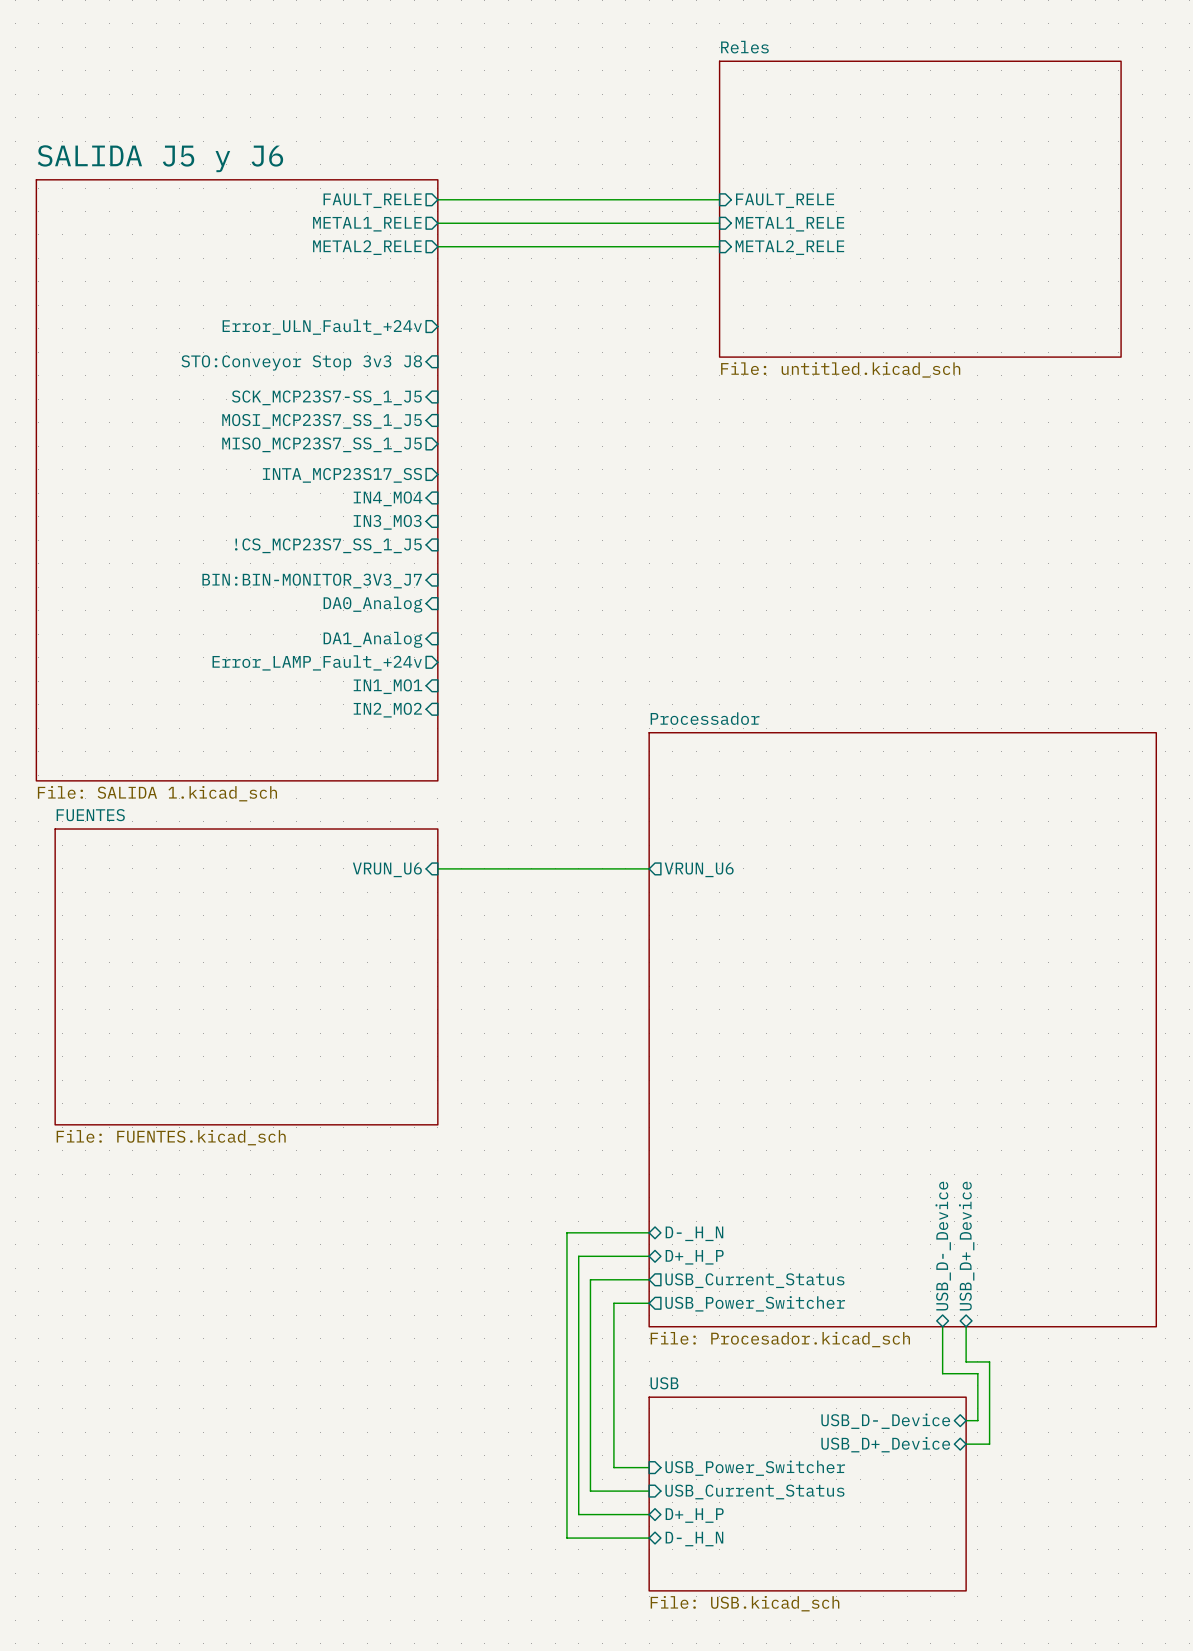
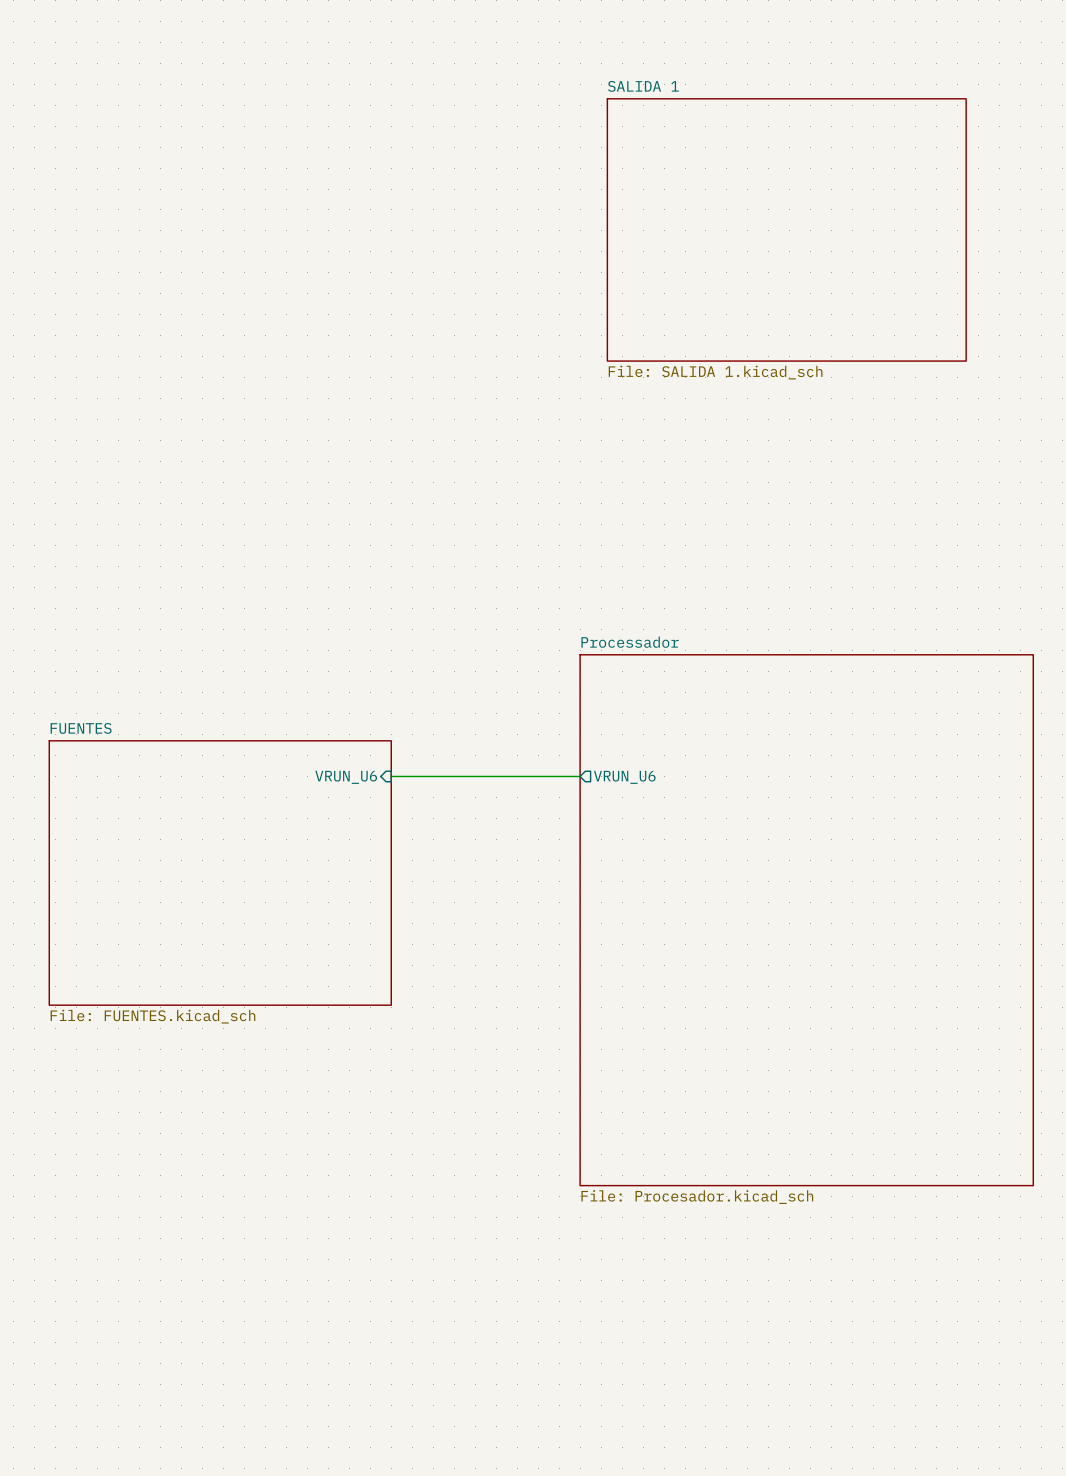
wire: (437, 199) (719, 199) -> none
sheet pin: FAULT_RELE (372, 200) -> none
sheet pin: FAULT_RELE (785, 200) -> none
sheet Reles: File: untitled.kicad_sch (920, 209) -> none
wire: (437, 223) (719, 223) -> none
sheet pin: METAL1_RELE (367, 224) -> none
sheet pin: METAL1_RELE (789, 224) -> none
wire: (437, 246) (719, 246) -> none
sheet pin: METAL2_RELE (367, 247) -> none
sheet pin: METAL2_RELE (789, 247) -> none
sheet SALIDA 1: none -> File: SALIDA 1.kicad_sch (786, 229)
sheet pin: Error_ULN_Fault_+24v (322, 327) -> none
sheet pin: STO:Conveyor Stop 3v3 J8 (301, 362) -> none
sheet pin: SCK_MCP23S7-SS_1_J5 (326, 397) -> none
sheet pin: MOSI_MCP23S7_SS_1_J5 (322, 421) -> none
sheet pin: MISO_MCP23S7_SS_1_J5 (322, 444) -> none
sheet pin: INTA_MCP23S17_SS (342, 475) -> none
sheet SALIDA J5 y J6: File: SALIDA 1.kicad_sch (237, 480) -> none
sheet pin: IN4_MO4 (388, 498) -> none
sheet pin: IN3_MO3 (387, 522) -> none
sheet pin: !CS_MCP23S7_SS_1_J5 (328, 545) -> none
sheet pin: BIN:BIN-MONITOR_3V3_J7 (312, 581) -> none
sheet pin: DA0_Analog (372, 604) -> none
sheet pin: DA1_Analog (372, 639) -> none
sheet pin: Error_LAMP_Fault_+24v (317, 662) -> none
sheet pin: IN1_MO1 (387, 686) -> none
sheet pin: IN2_MO2 (387, 710) -> none
wire: (649, 1232) (566, 1232) (566, 1538) (649, 1538) -> none
sheet pin: D-_H_N (694, 1233) -> none
sheet pin: USB_D-_Device (943, 1246) -> none
sheet pin: USB_D+_Device (966, 1246) -> none
wire: (649, 1256) (578, 1256) (578, 1514) (649, 1514) -> none
sheet pin: D+_H_P (694, 1257) -> none
wire: (649, 1279) (590, 1279) (590, 1491) (649, 1491) -> none
sheet pin: USB_Current_Status (754, 1280) -> none
wire: (649, 1303) (613, 1303) (613, 1467) (649, 1467) -> none
sheet pin: USB_Power_Switcher (755, 1303) -> none
wire: (942, 1326) (942, 1373) (977, 1373) (977, 1420) (966, 1420) -> none
wire: (966, 1326) (966, 1361) (989, 1361) (989, 1444) (966, 1444) -> none
sheet pin: USB_D-_Device (885, 1421) -> none
sheet pin: USB_D+_Device (885, 1444) -> none
sheet pin: USB_Power_Switcher (755, 1468) -> none
sheet pin: USB_Current_Status (754, 1491) -> none
sheet USB: File: USB.kicad_sch (807, 1494) -> none
sheet pin: D+_H_P (694, 1515) -> none
sheet pin: D-_H_N (694, 1539) -> none

